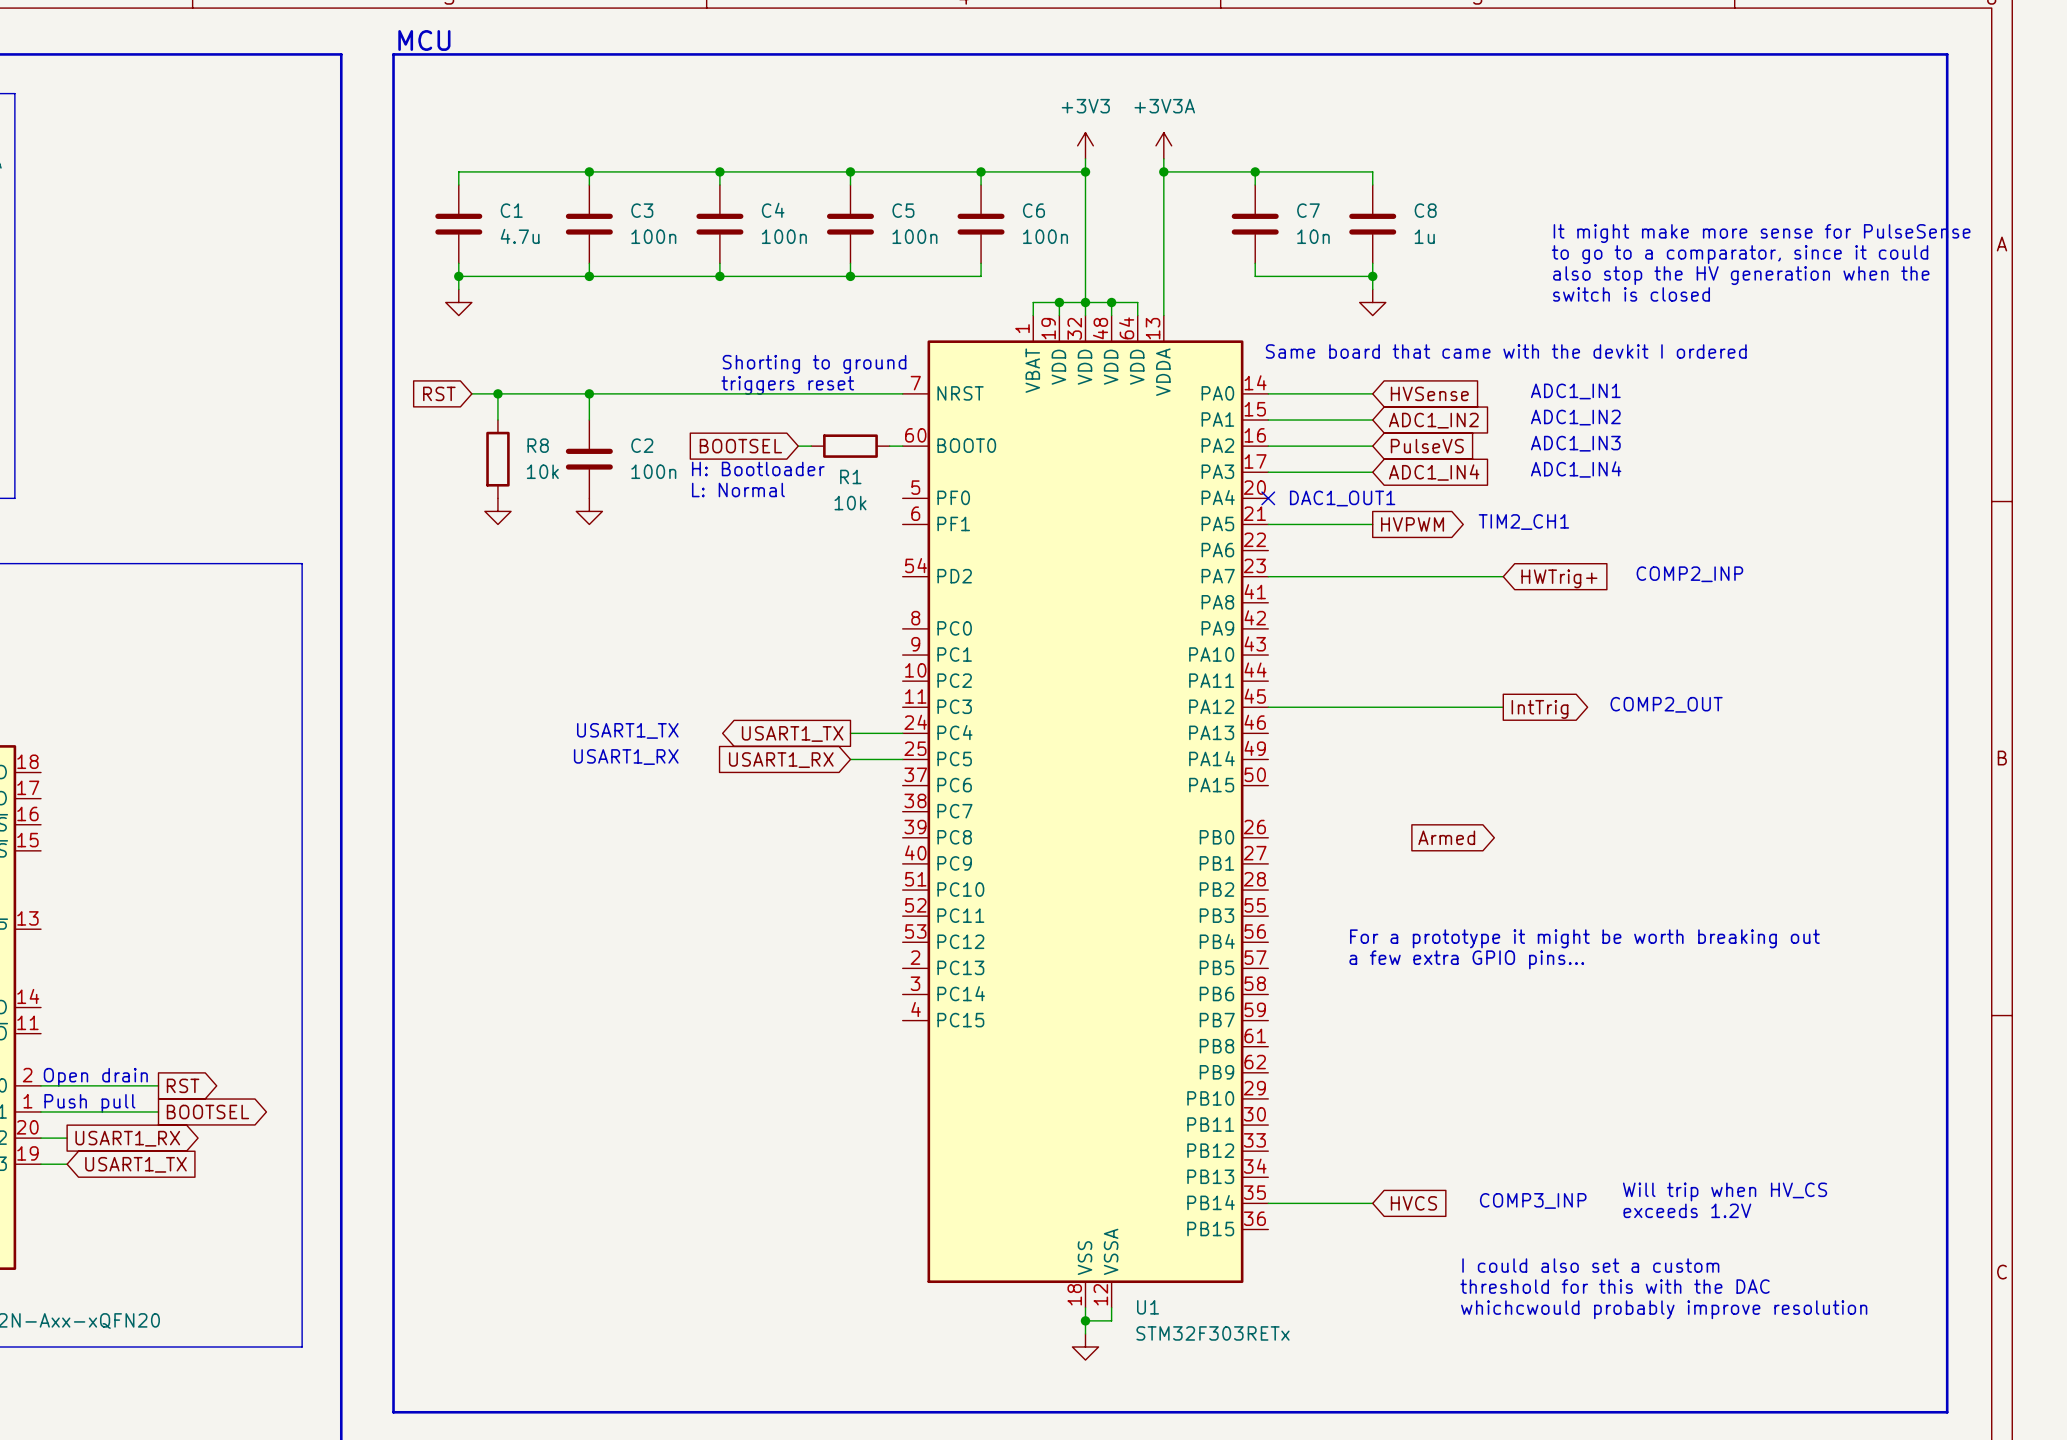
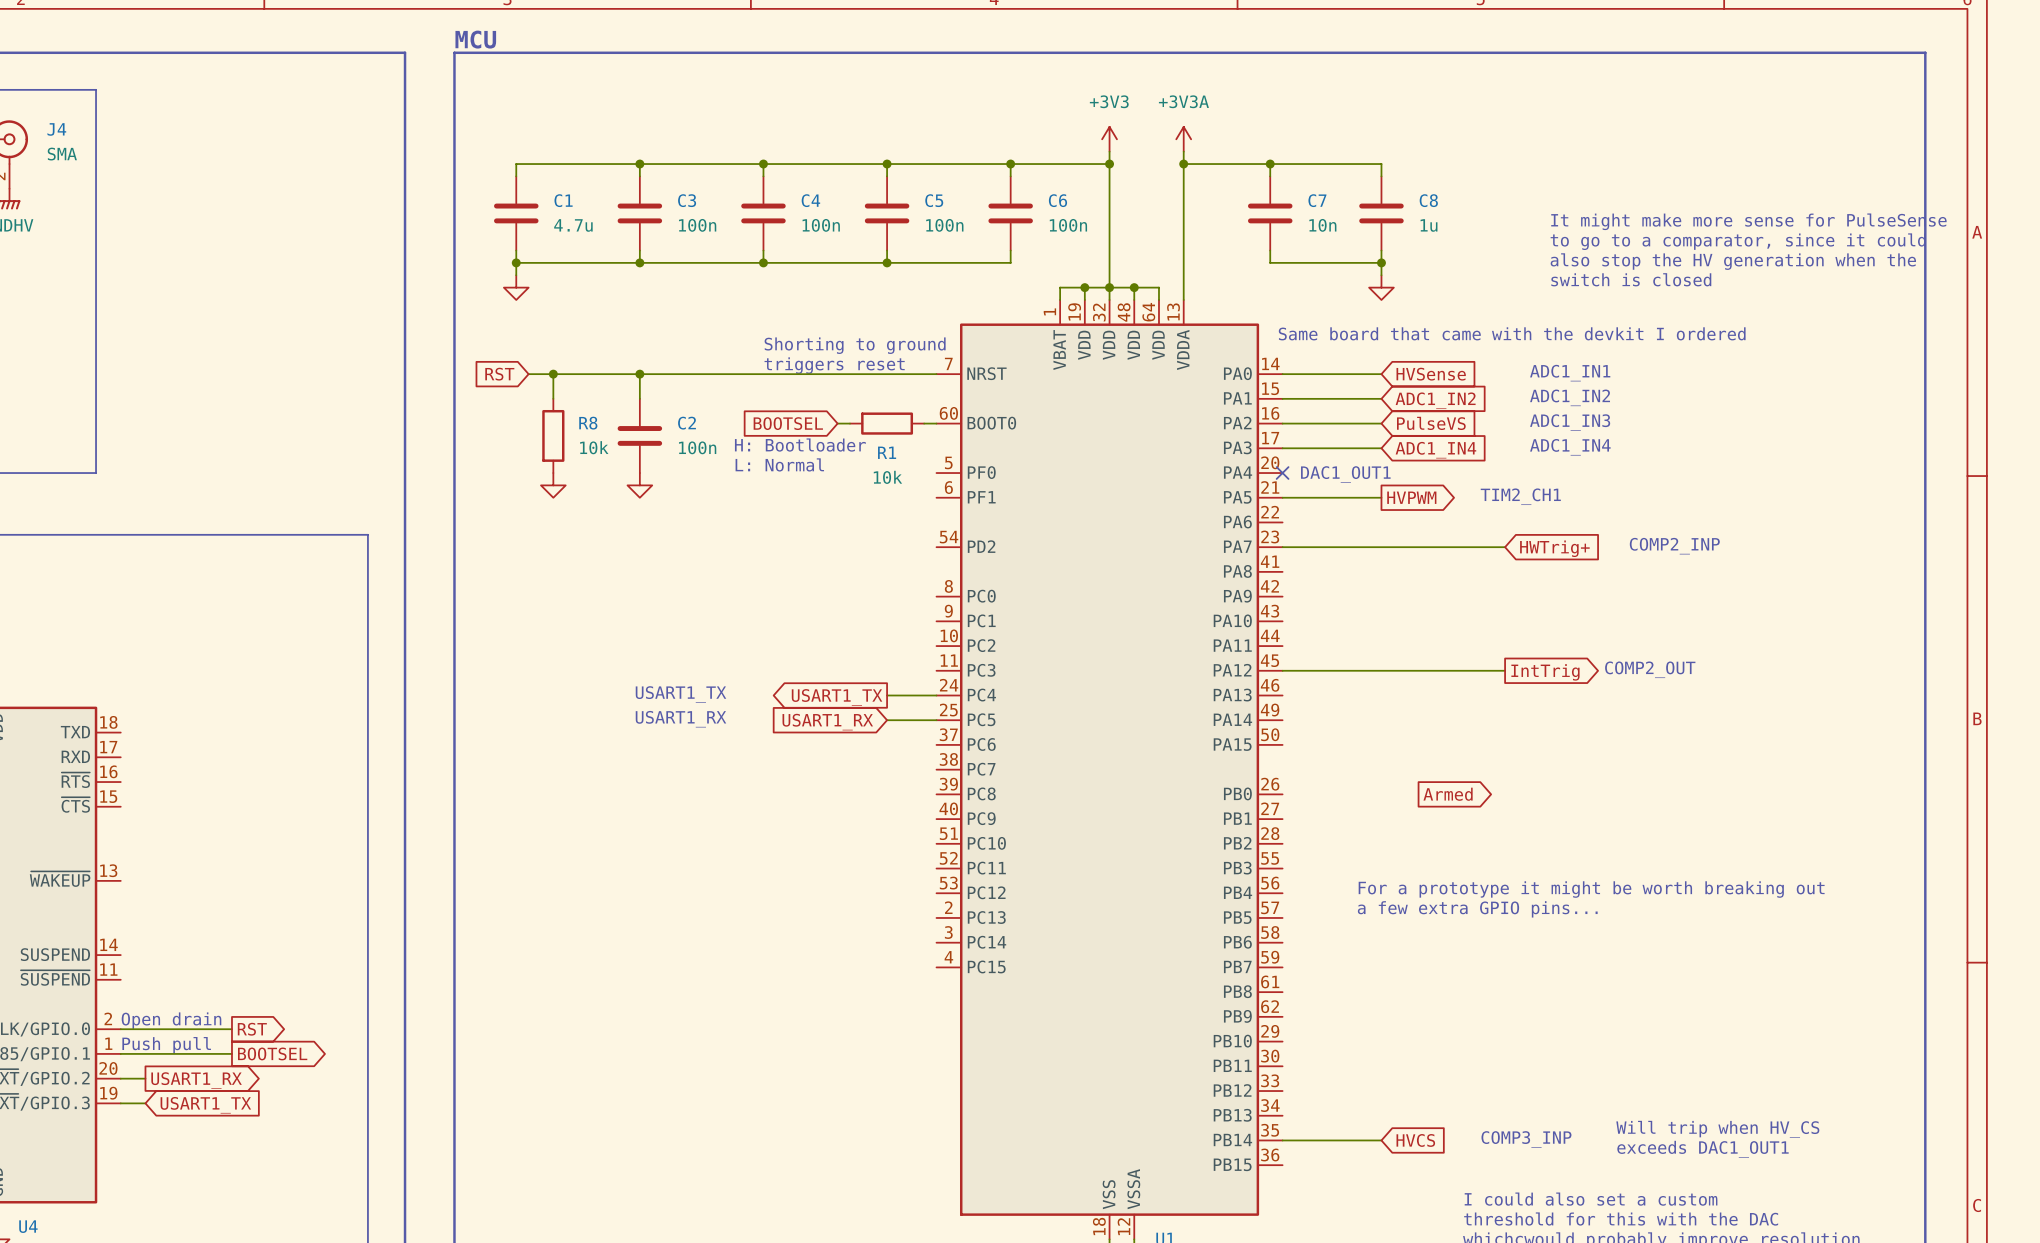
text: exceeds 1.2V (1687, 1210) -> exceeds DAC1_OUT1 (1703, 1149)

